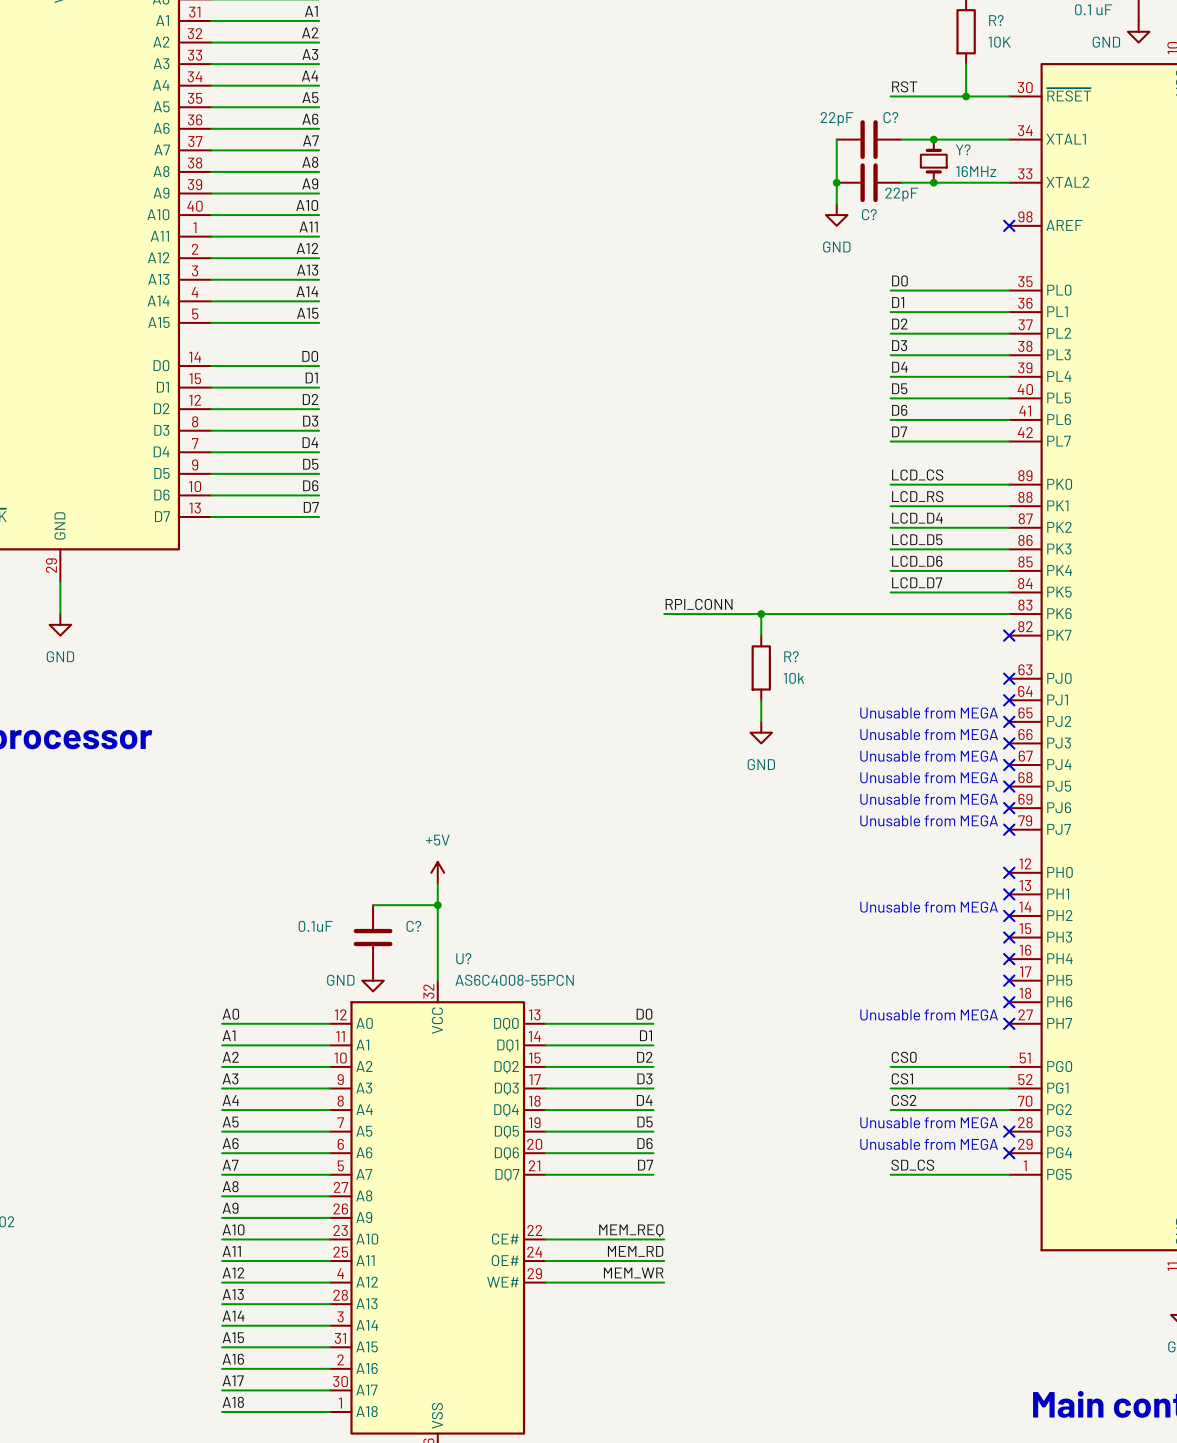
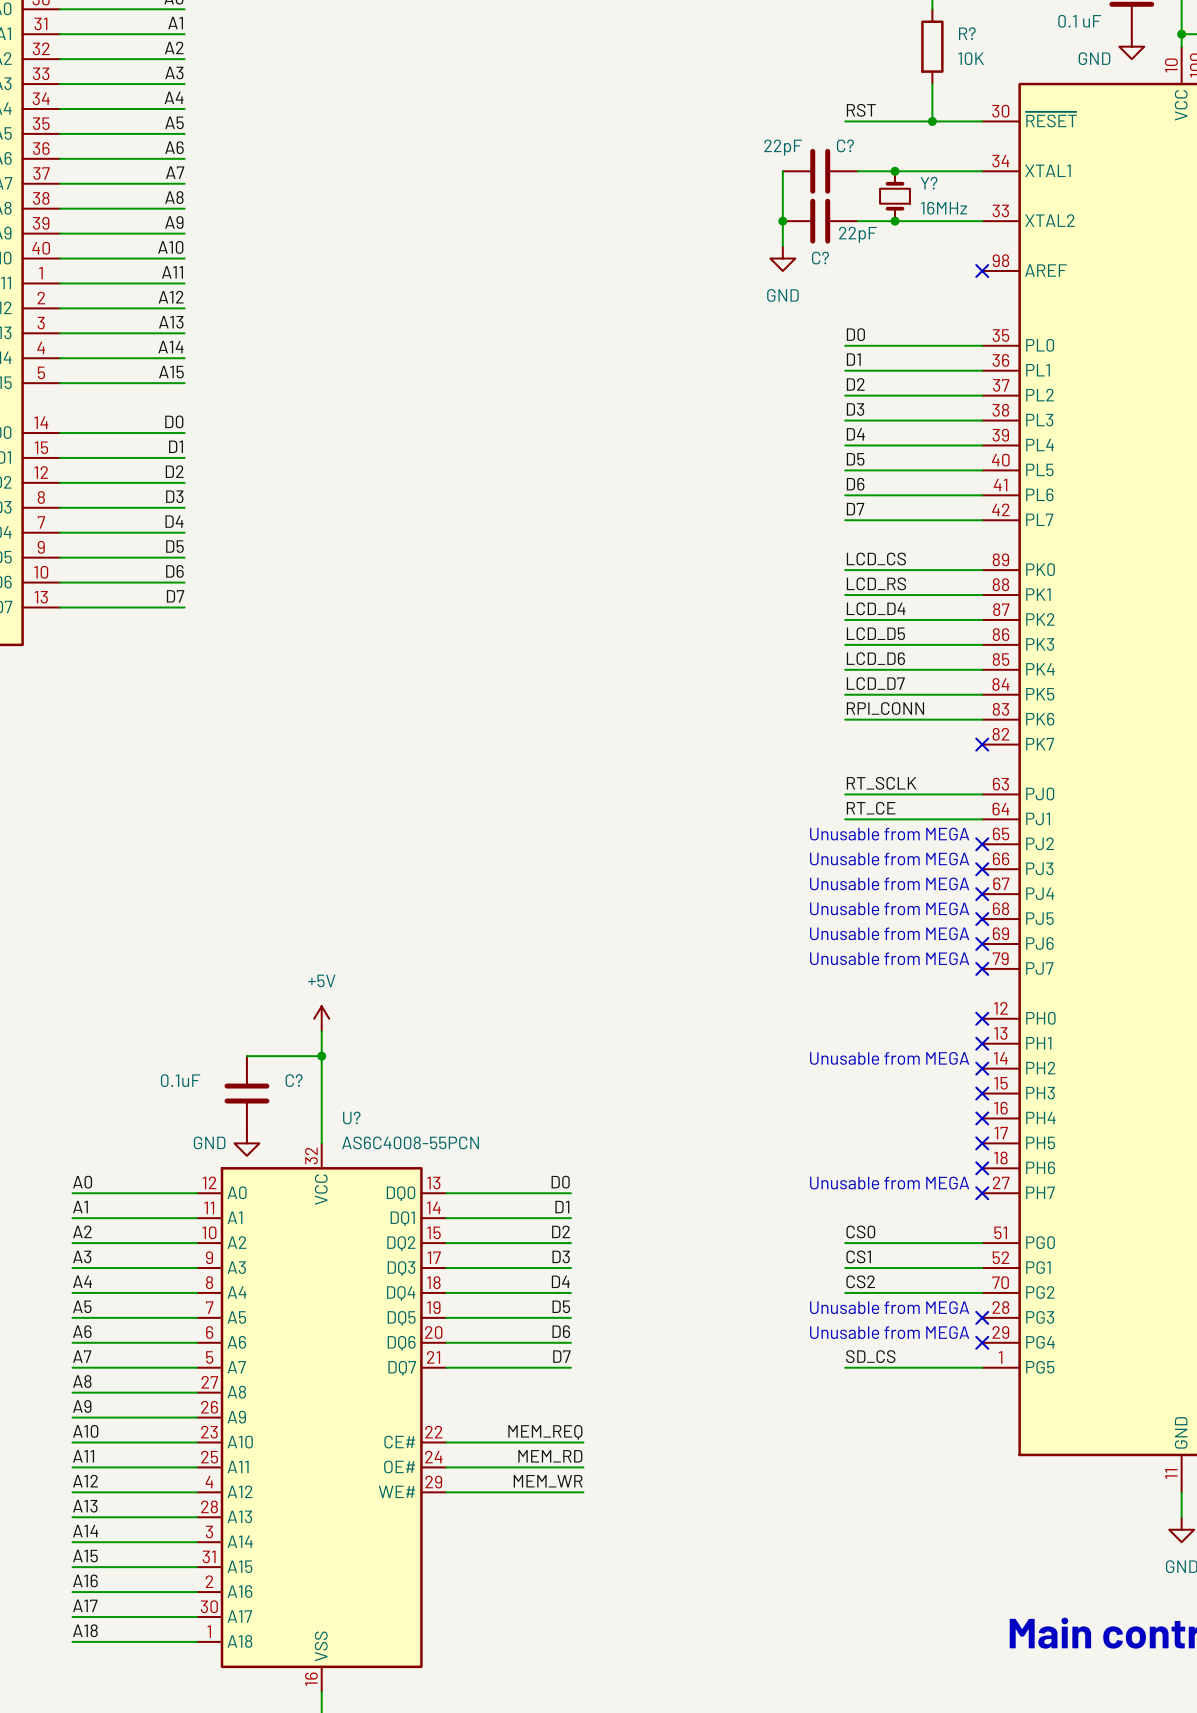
label: RPI_CONN (699, 604) -> none
label: none -> RPI_CONN (885, 708)
wire: (664, 614) (890, 614) -> none
wire: (761, 614) (761, 635) -> none
junction: (761, 614) -> none
R?: 10k (761, 667) -> none
label: none -> RT_SCLK (881, 783)
wire: none -> (845, 794) (982, 794)
no-connect mark: (1009, 678) -> none
label: none -> RT_CE (871, 808)
wire: (761, 700) (761, 721) -> none
wire: none -> (845, 819) (982, 819)
no-connect mark: (1009, 700) -> none
power symbol: GND (761, 732) -> none

